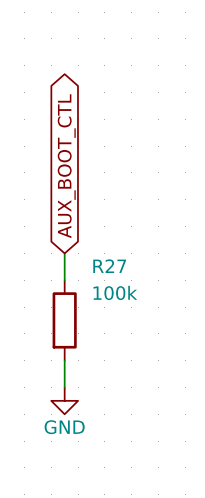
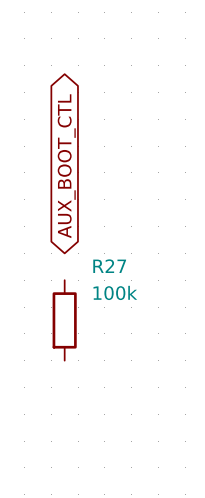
wire: (64, 253) (64, 280) -> none
wire: (64, 360) (64, 387) -> none
power symbol: GND (64, 400) -> none

